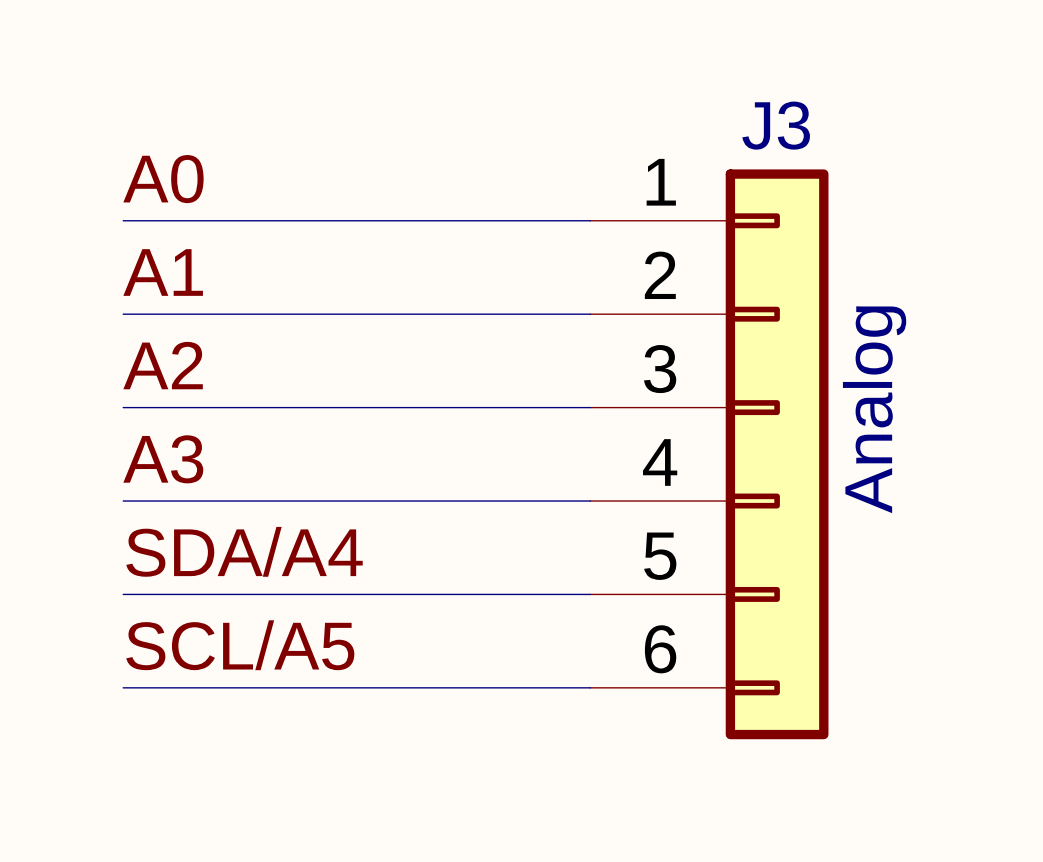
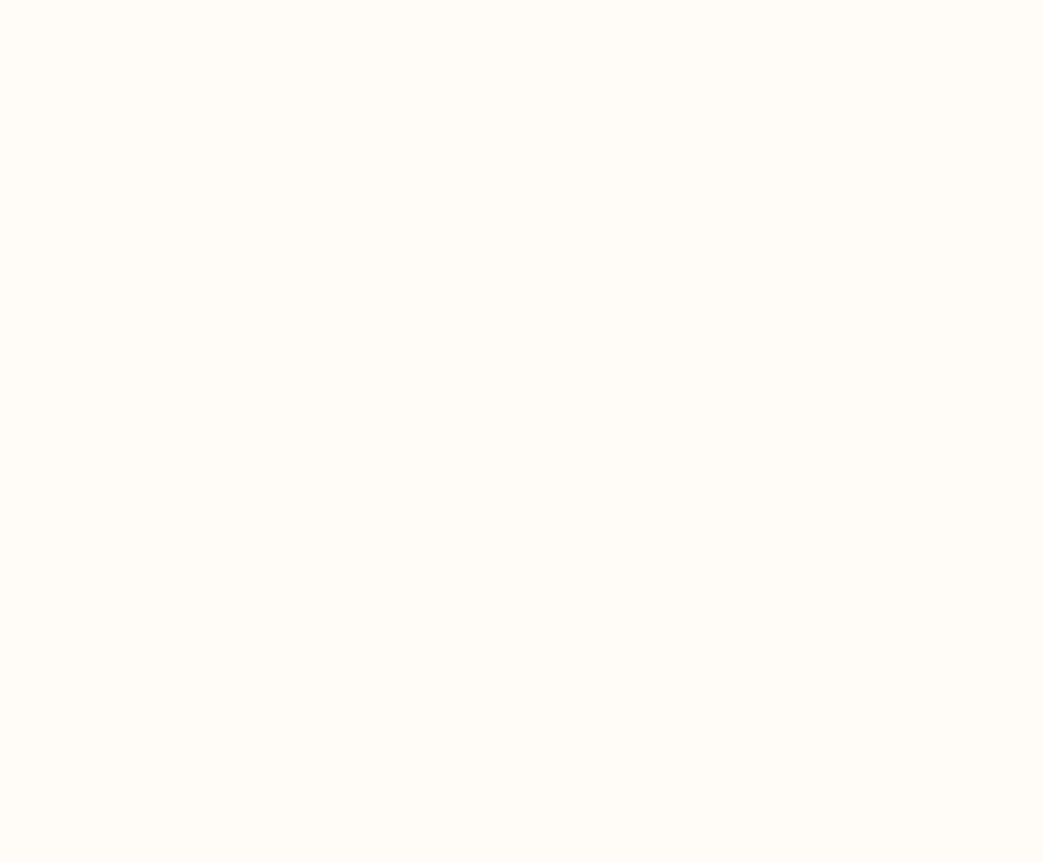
label: A0 (163, 179) -> none
wire: (123, 220) (590, 220) -> none
label: A1 (163, 272) -> none
wire: (123, 314) (590, 314) -> none
label: A2 (163, 365) -> none
wire: (123, 407) (590, 407) -> none
J3: Analog (709, 454) -> none
label: A3 (163, 459) -> none
wire: (123, 501) (590, 501) -> none
label: SDA/A4 (244, 551) -> none
wire: (123, 594) (590, 594) -> none
label: SCL/A5 (240, 645) -> none
wire: (123, 687) (590, 687) -> none

